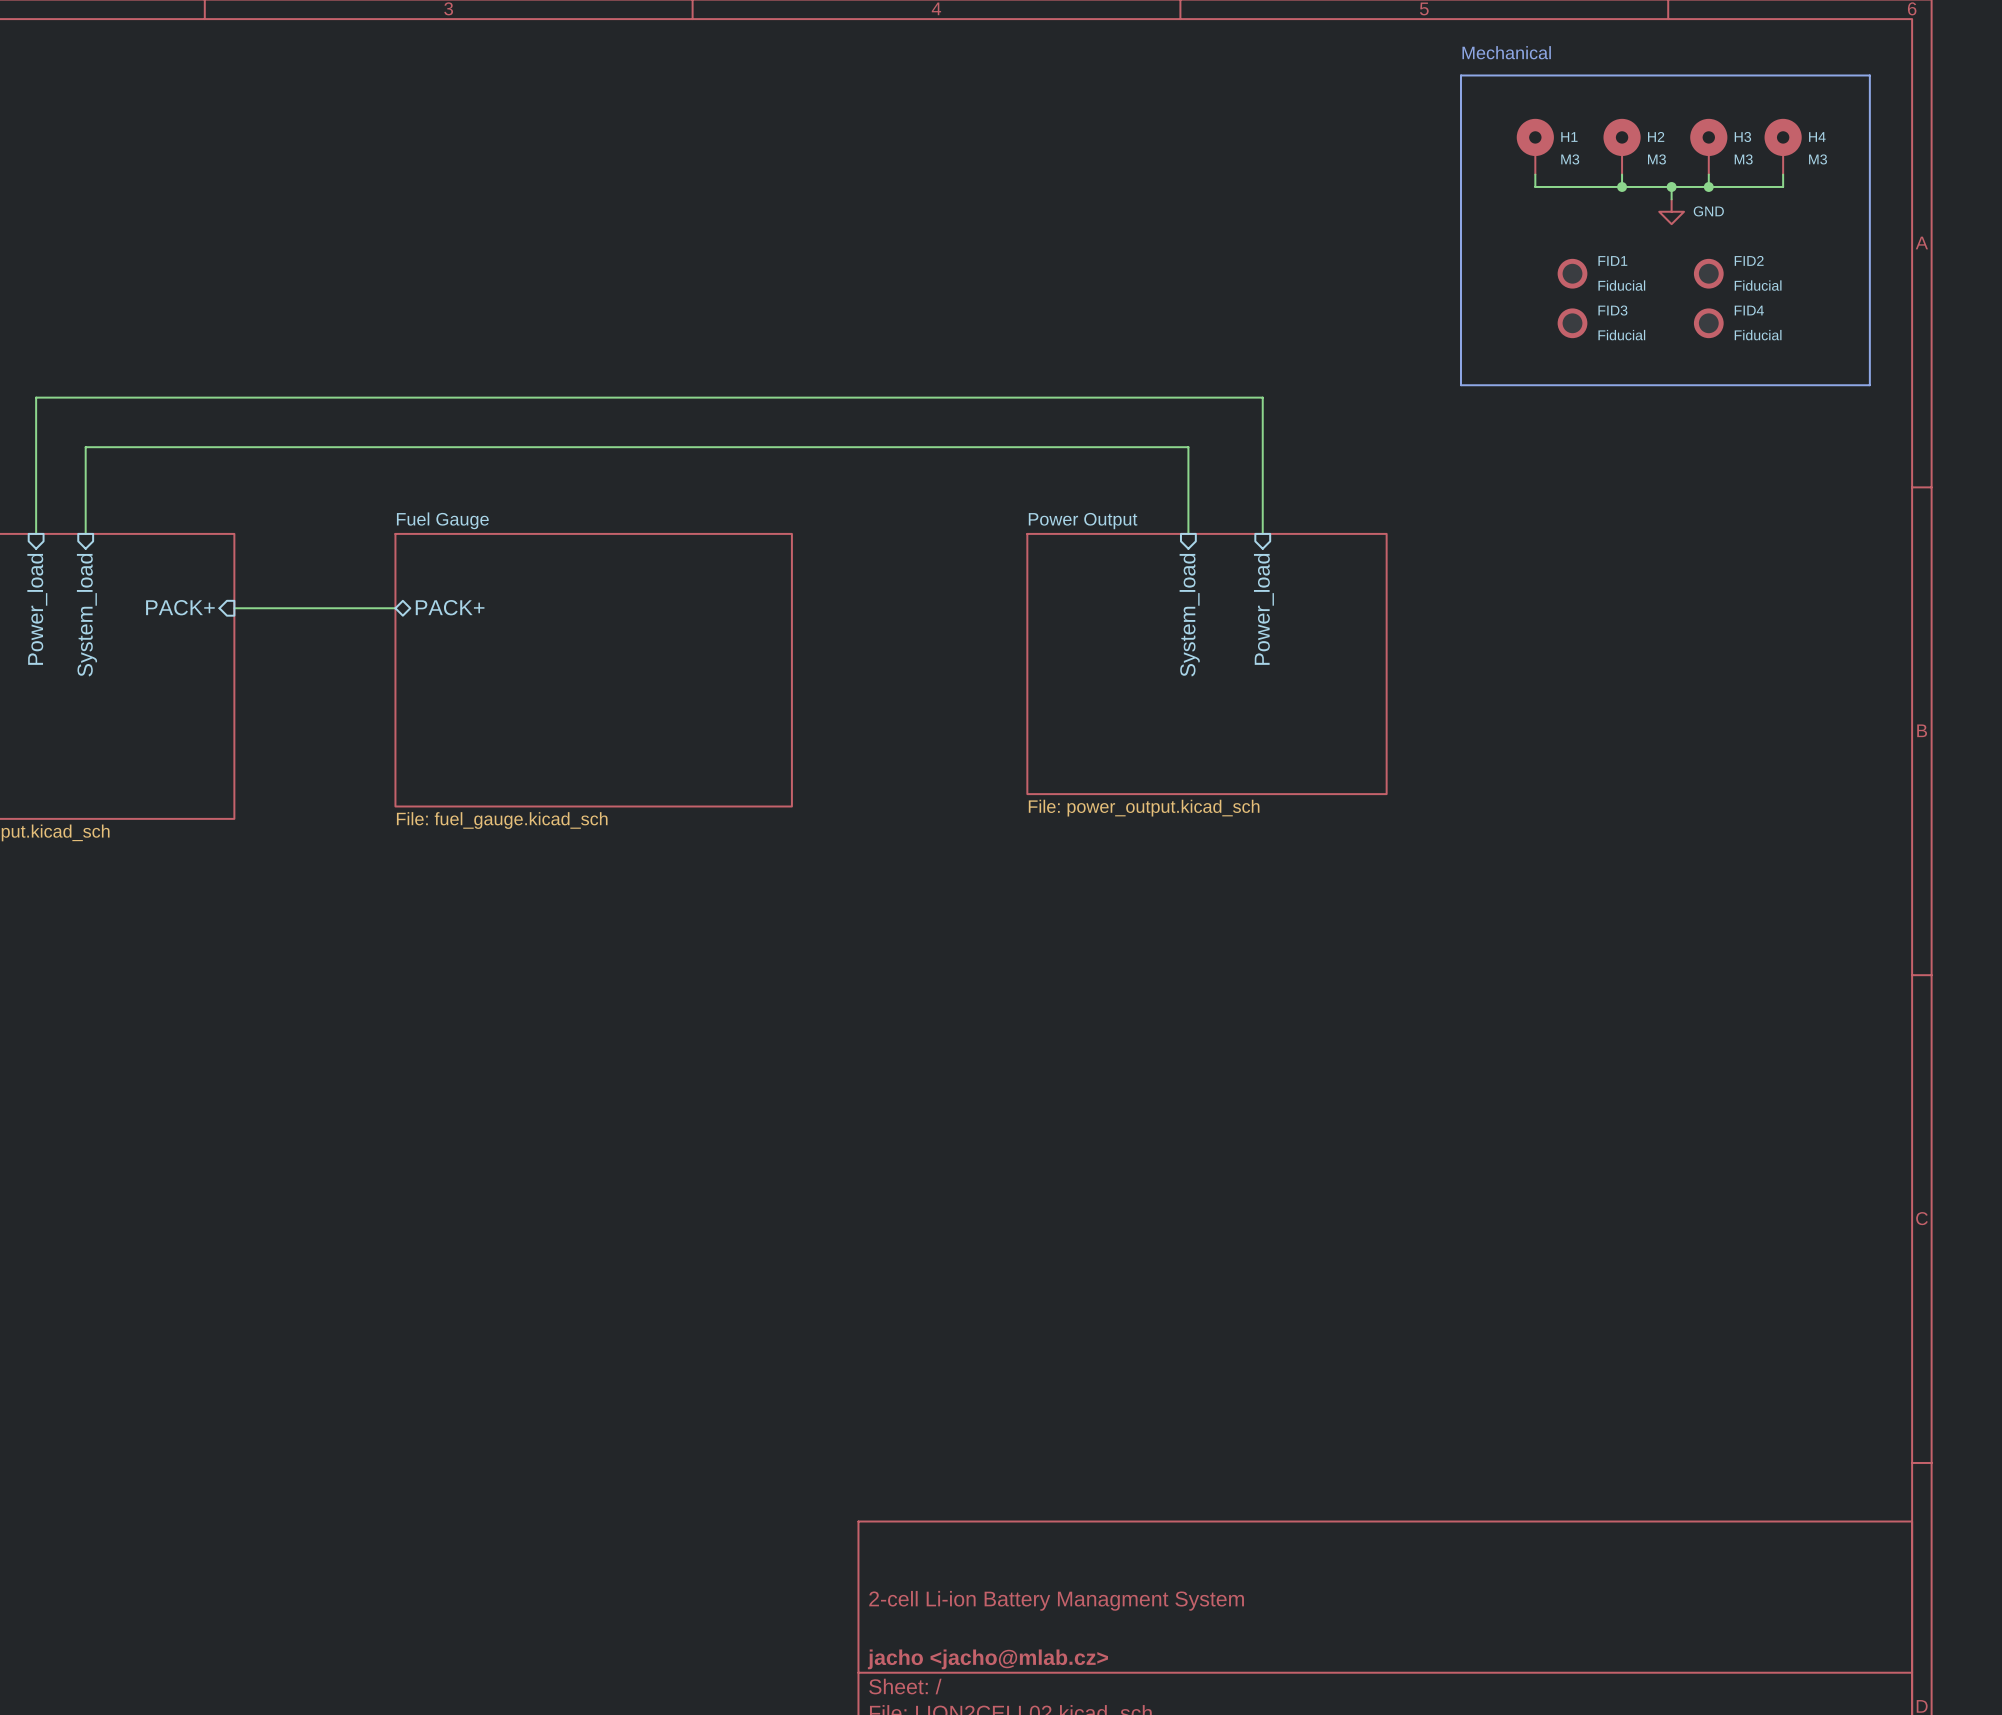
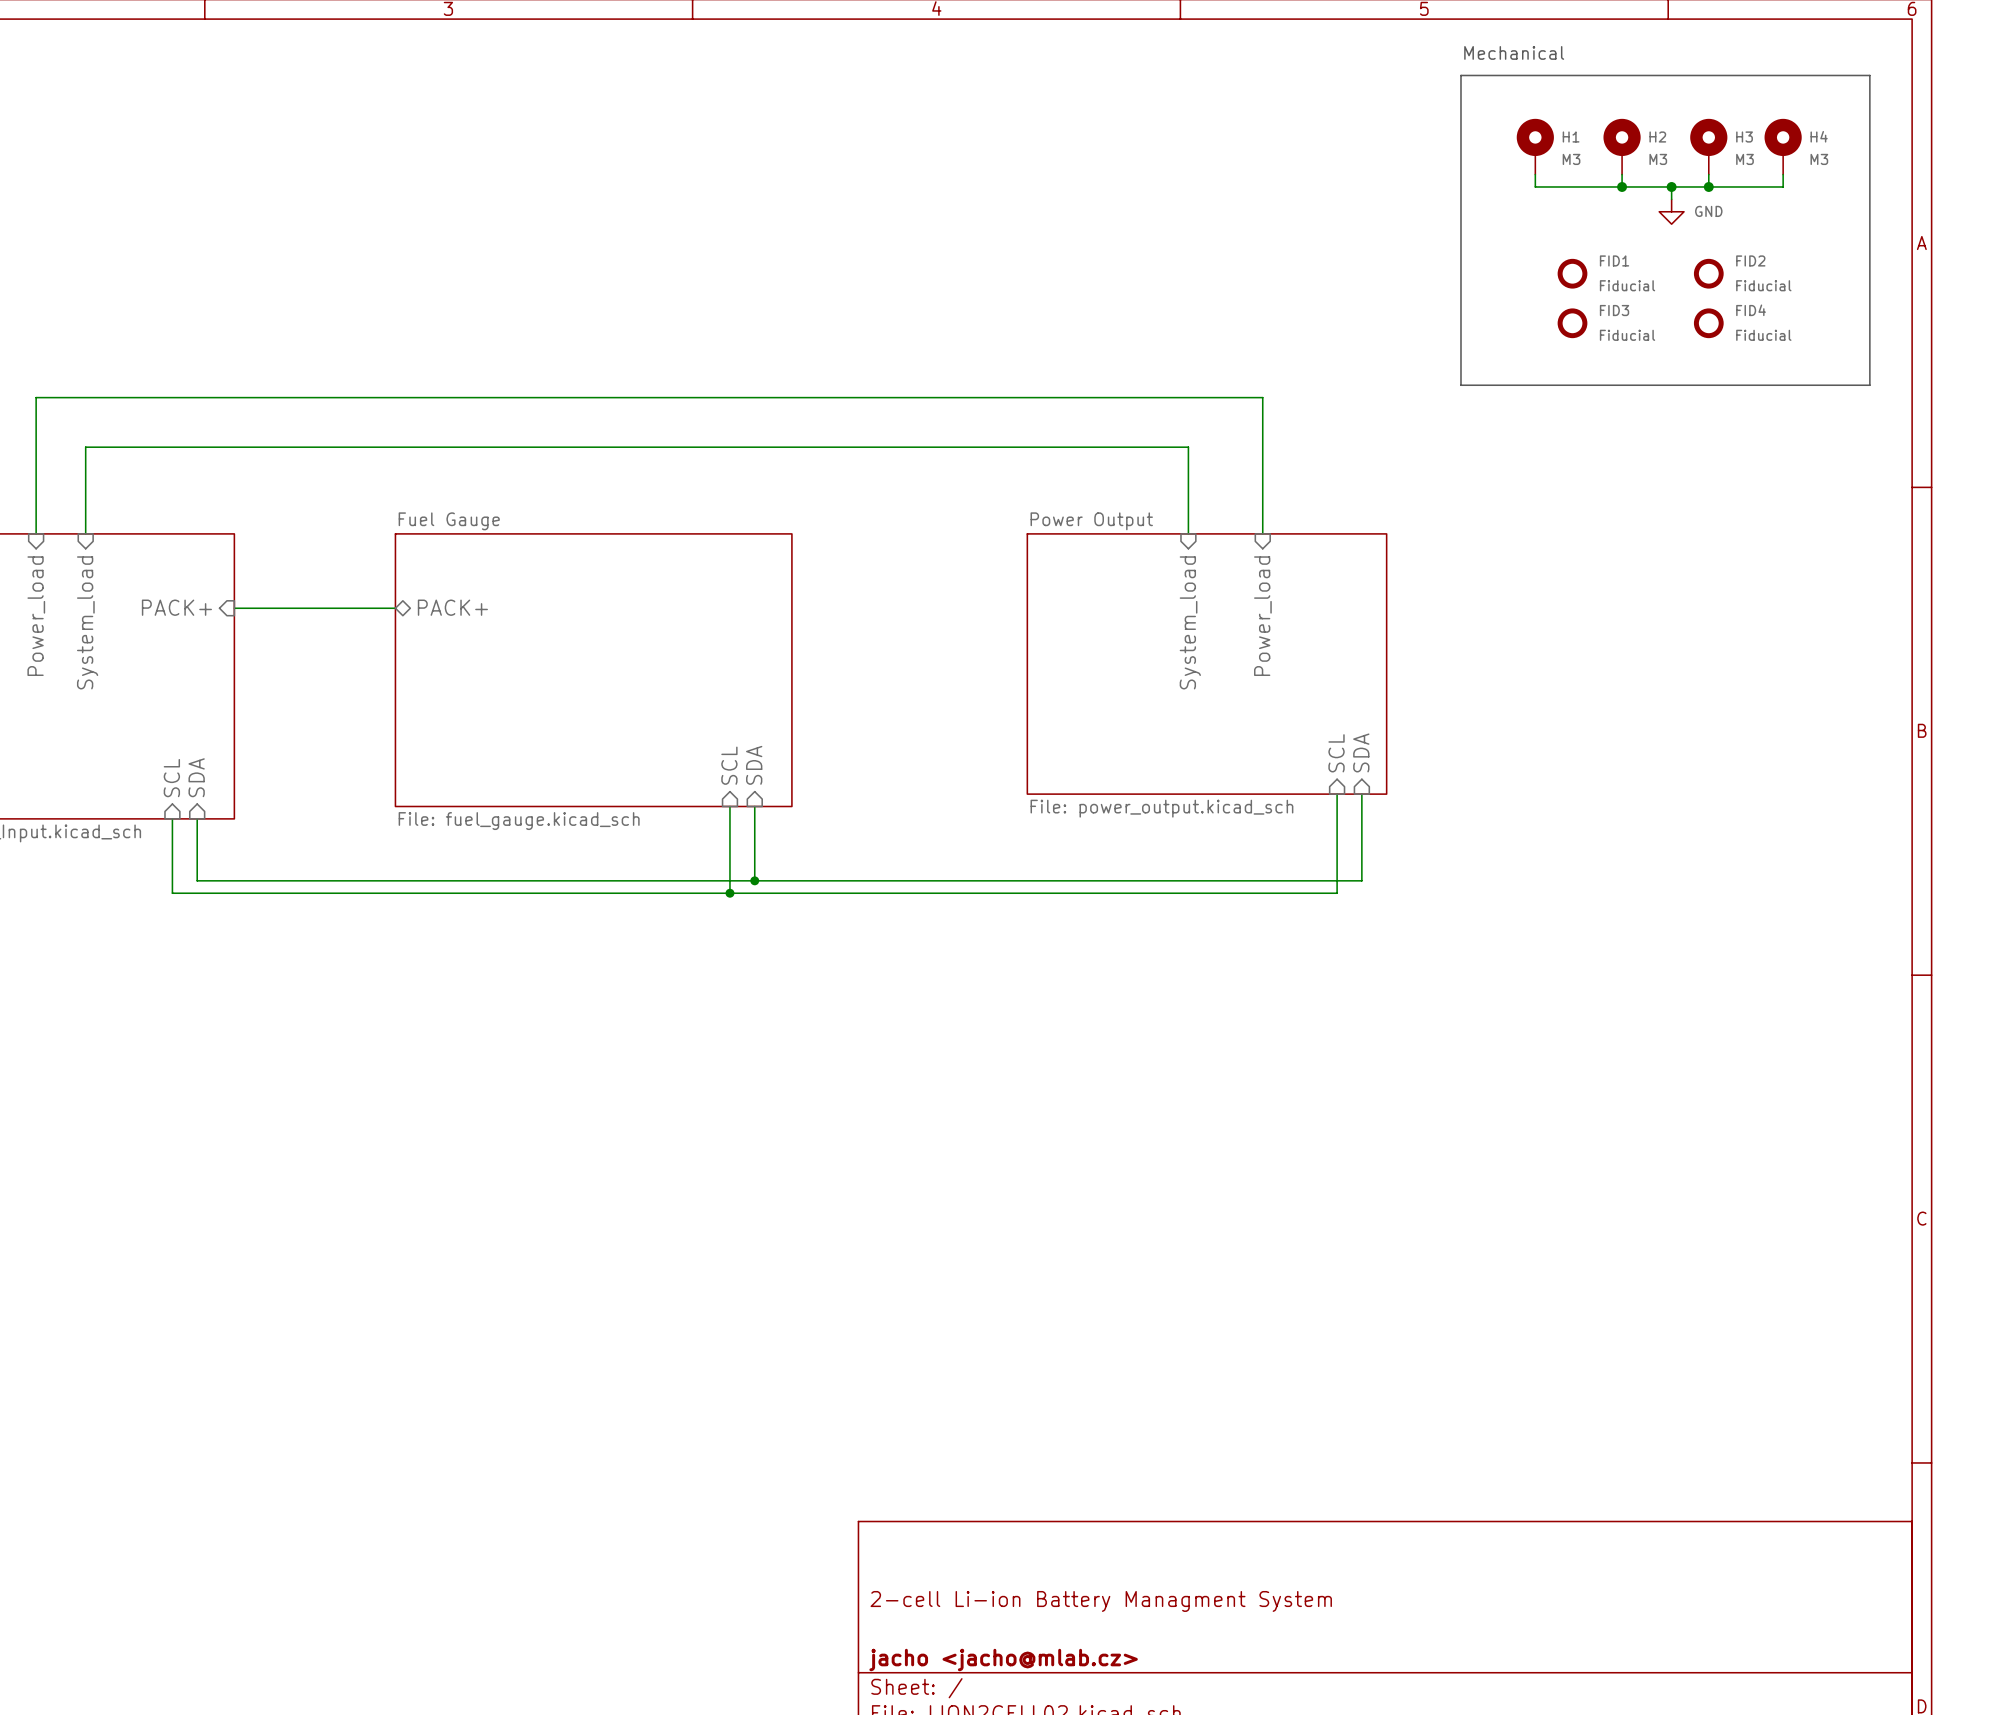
sheet pin: none -> SDA (1361, 752)
sheet pin: none -> SCL (1336, 753)
sheet pin: none -> SDA (754, 765)
sheet pin: none -> SCL (729, 765)
sheet pin: none -> SDA (196, 777)
sheet pin: none -> SCL (171, 778)
wire: none -> (1337, 794) (1337, 893) (172, 893) (172, 818)
wire: none -> (1361, 794) (1361, 880) (197, 880) (197, 818)
wire: none -> (729, 806) (729, 893)
wire: none -> (754, 806) (754, 880)
junction: none -> (754, 880)
junction: none -> (729, 893)

